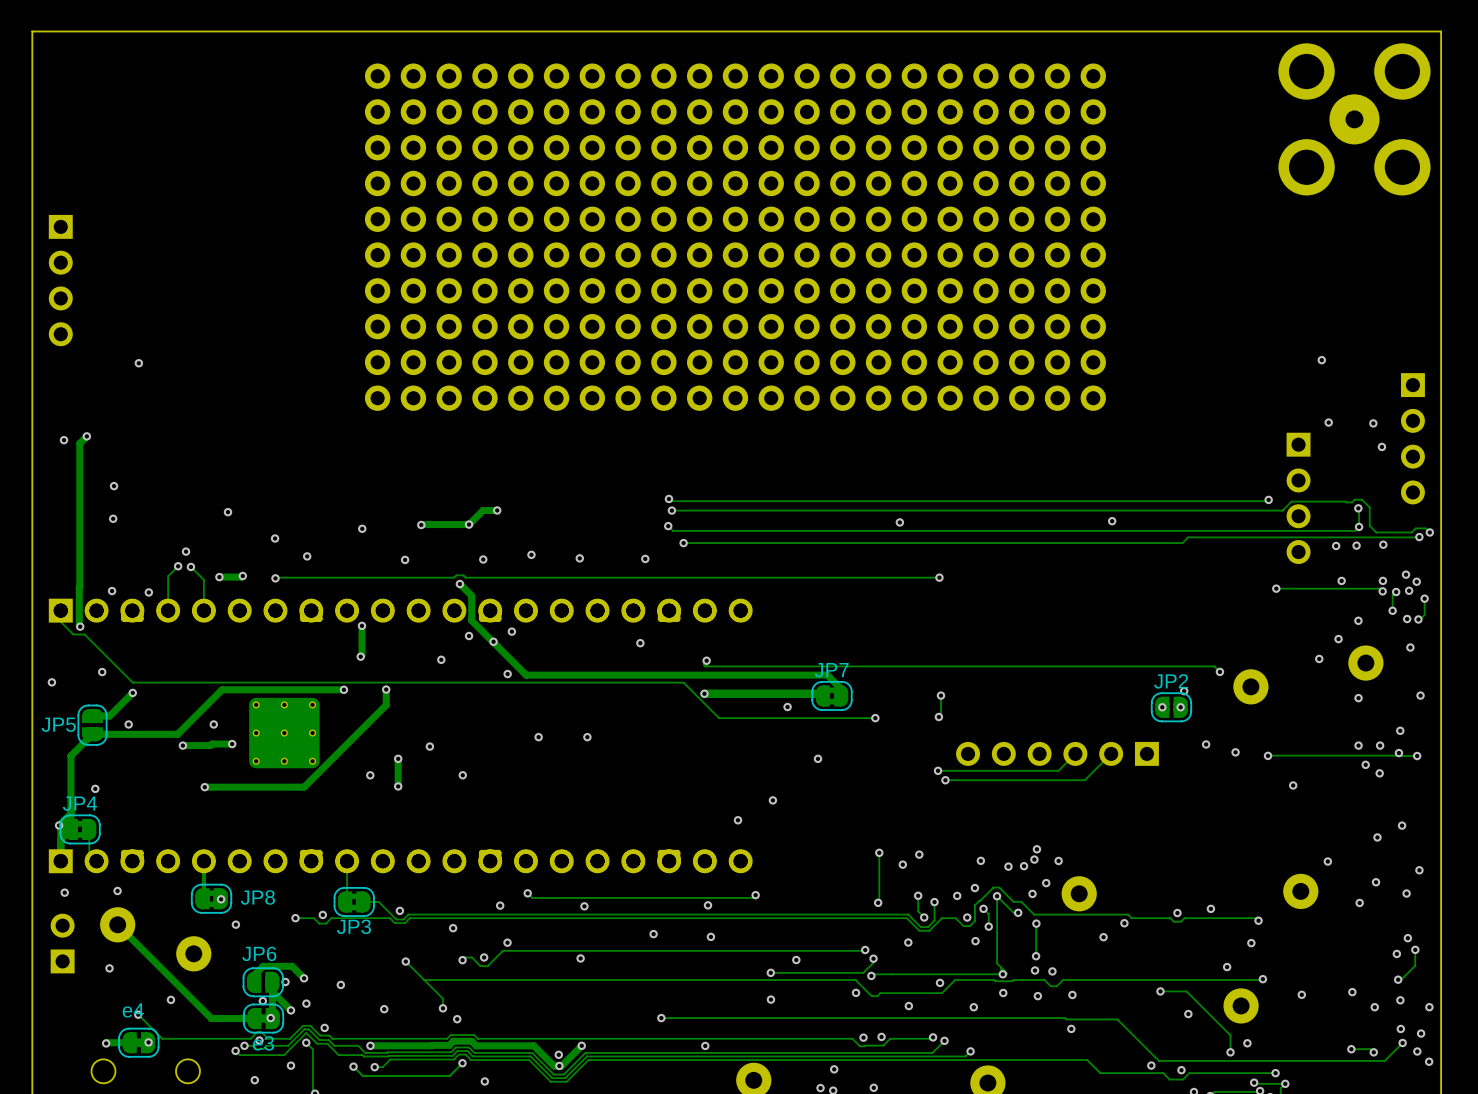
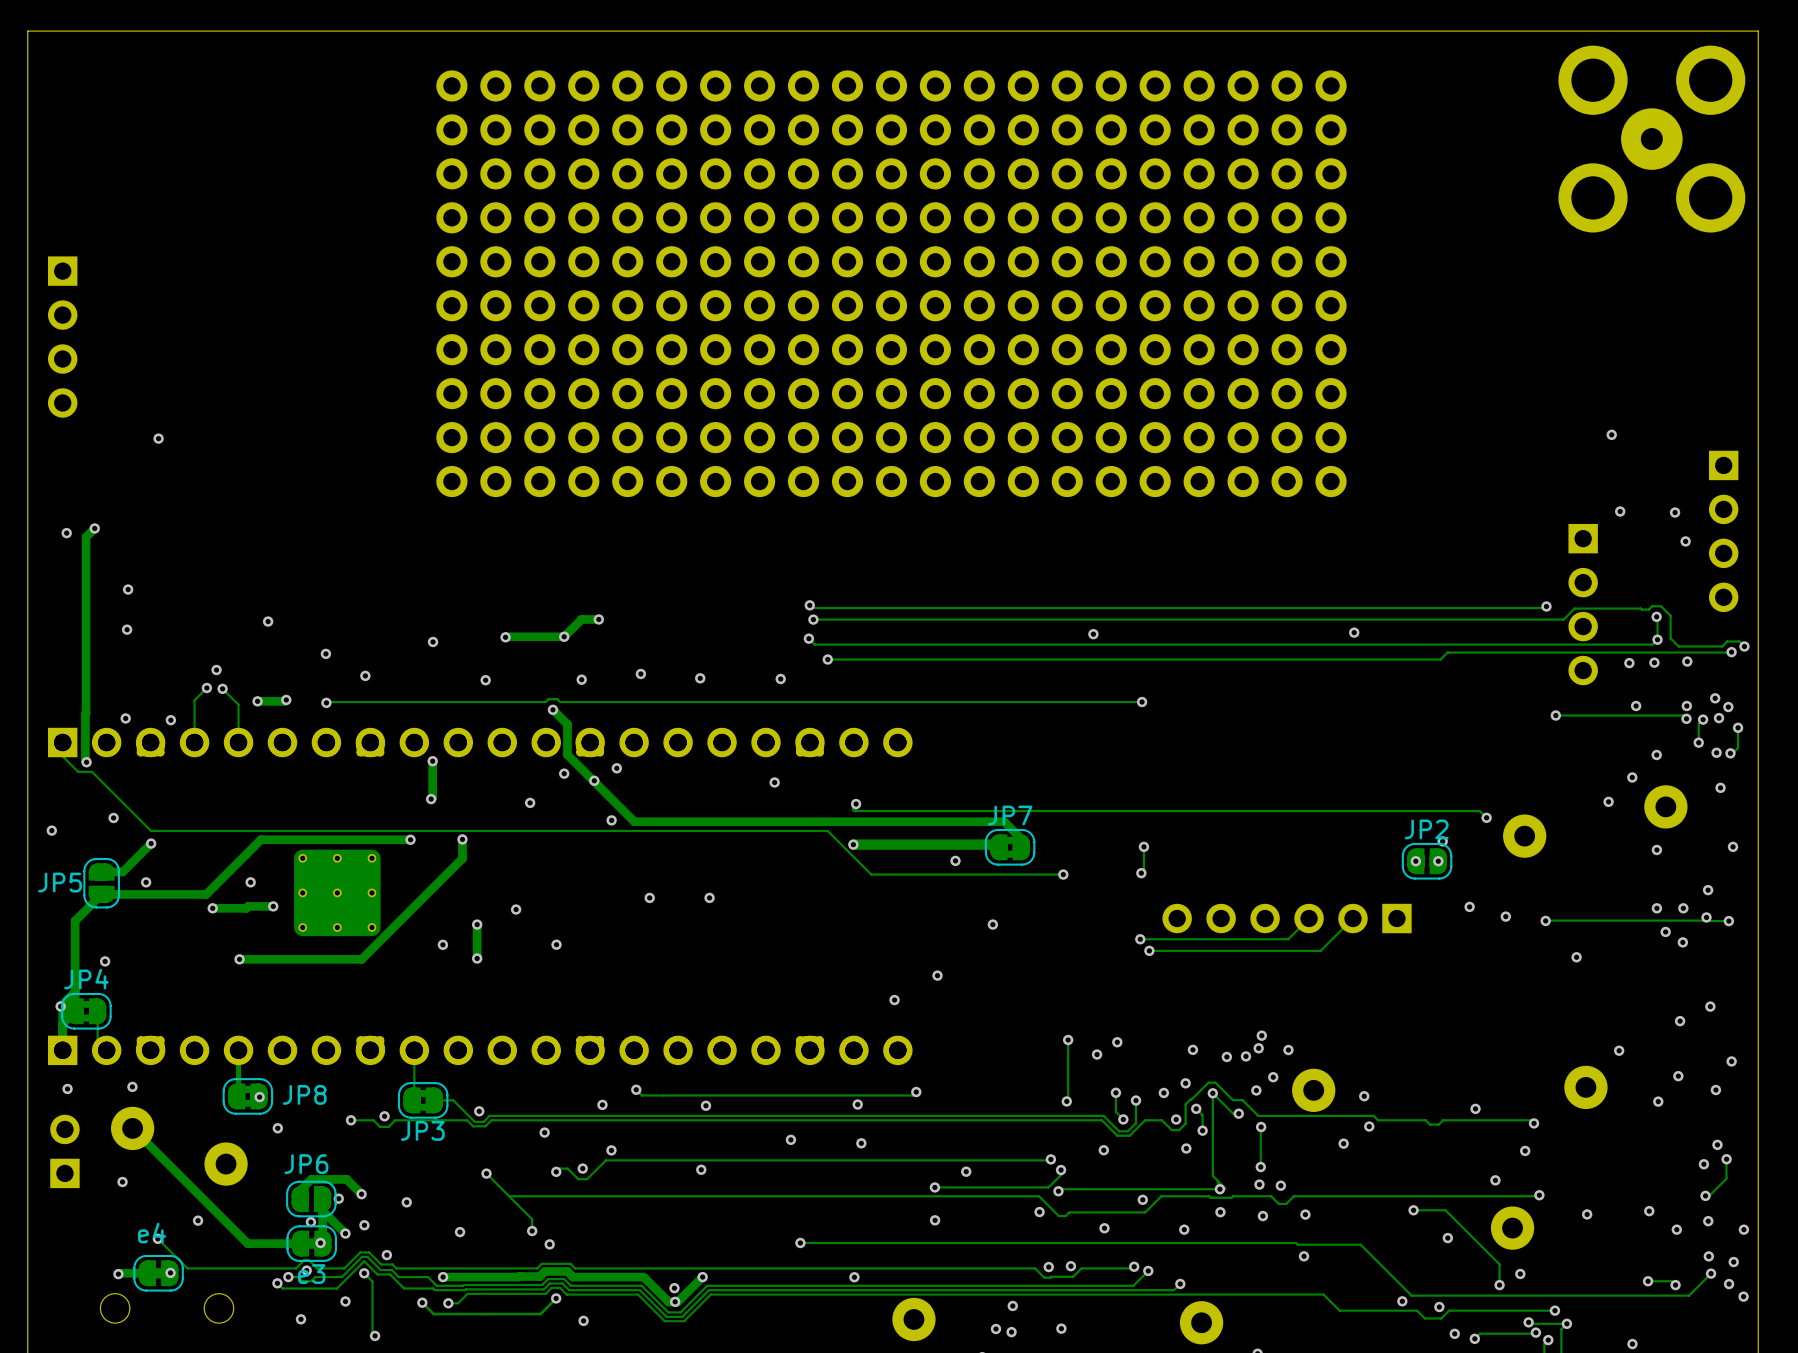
via position: (1177, 913) -> (1364, 1096)

